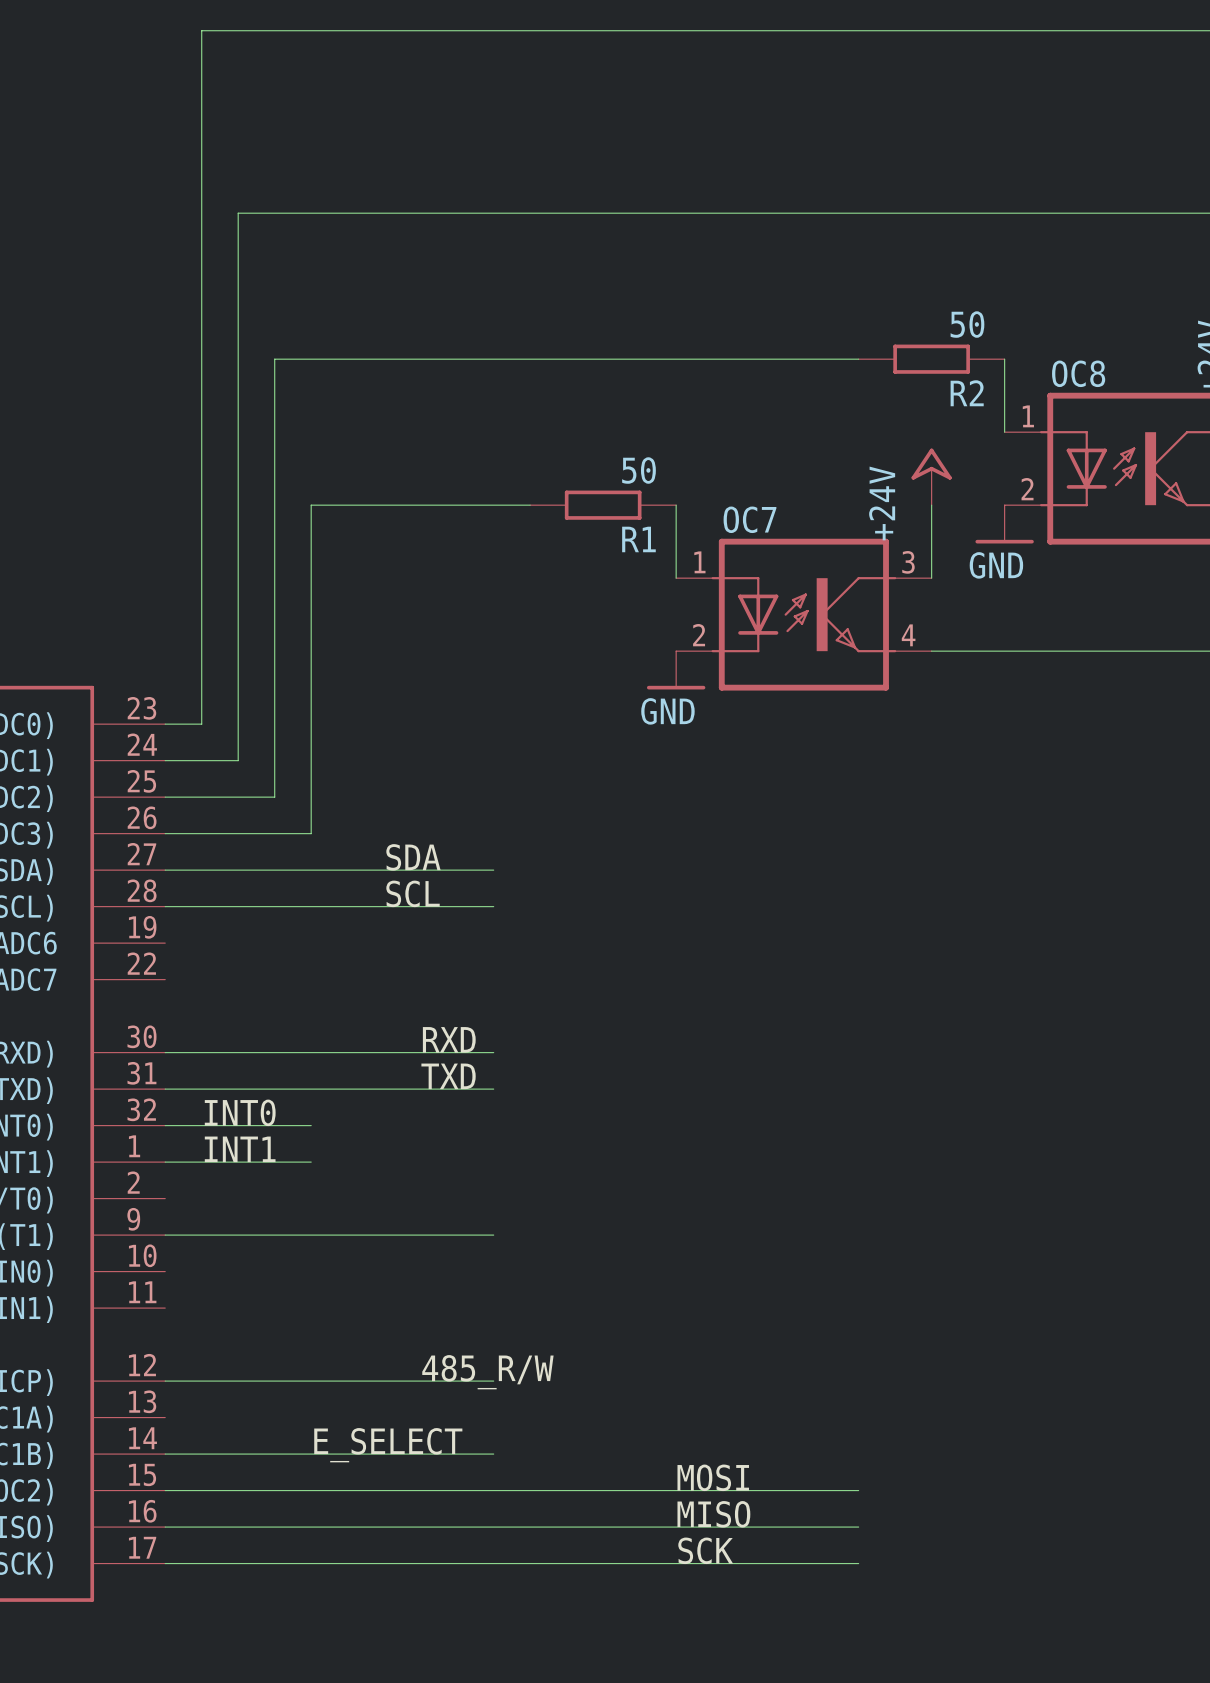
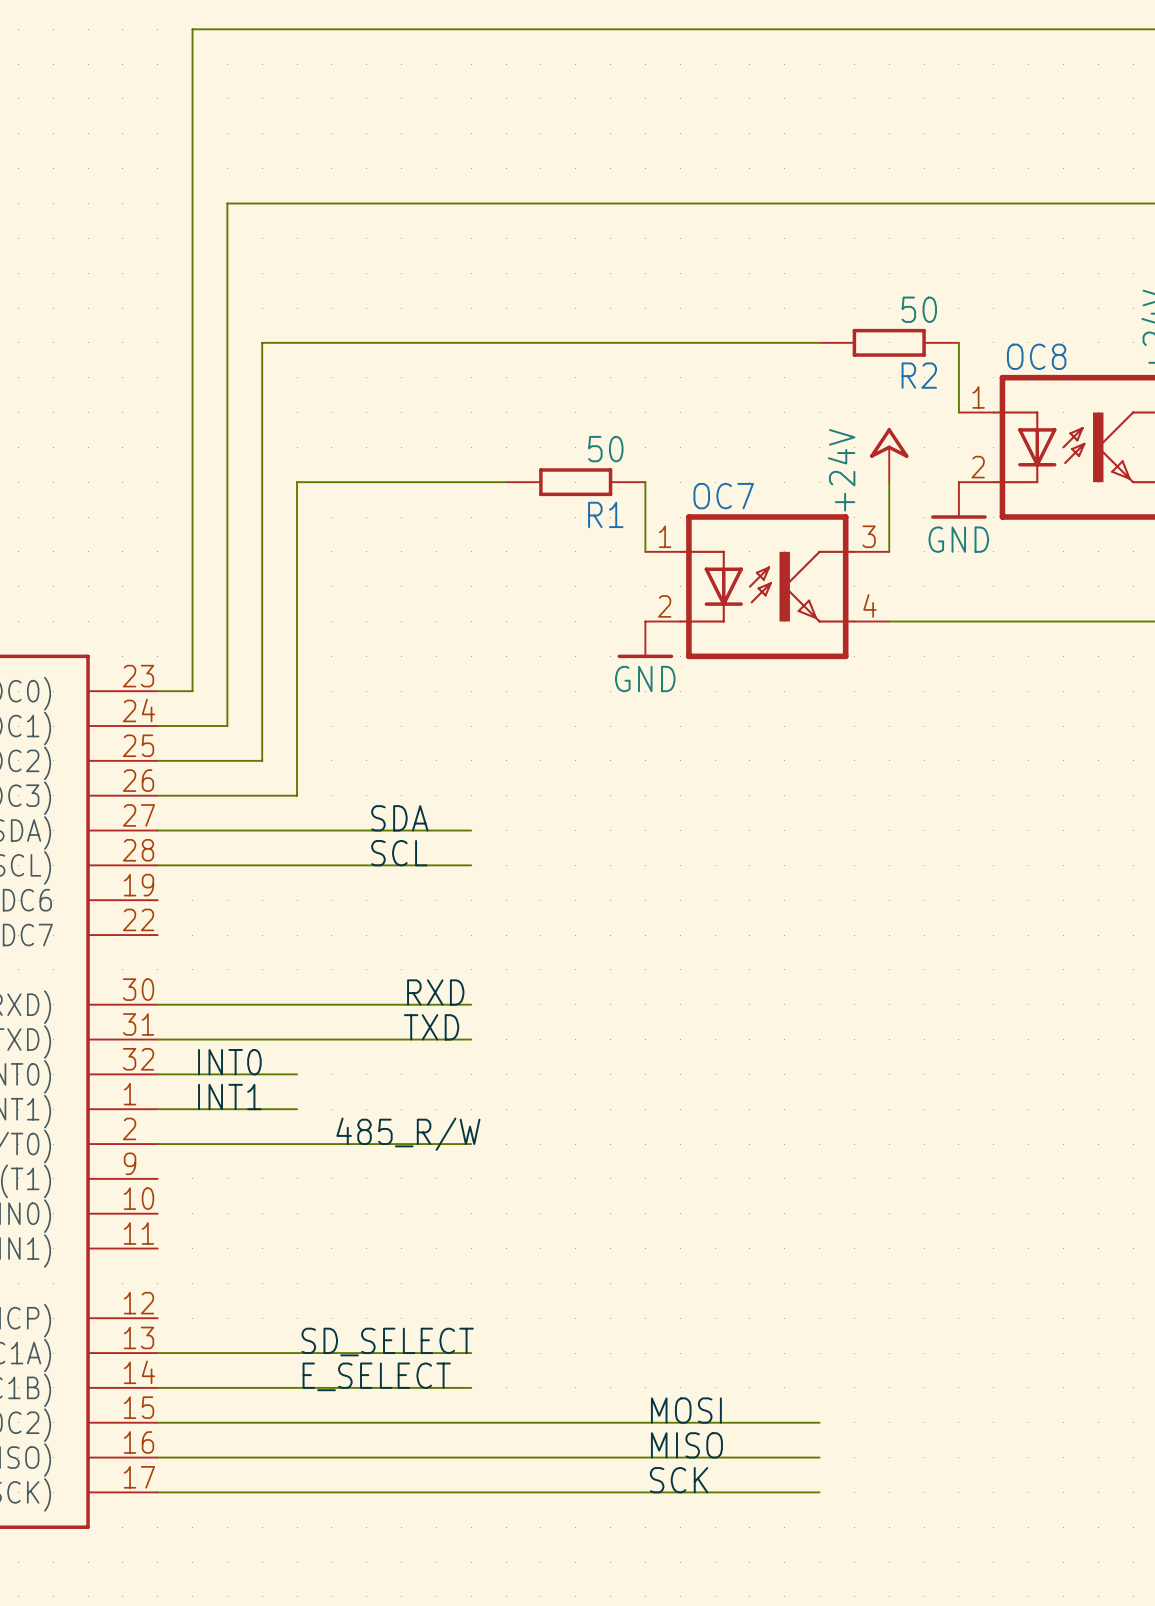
wire: (165, 1235) (493, 1235) -> (157, 1144) (471, 1144)
label position: 485_R/W (487, 1372) -> 485_R/W (408, 1134)
wire: (165, 1381) (493, 1381) -> (157, 1353) (471, 1353)
label: none -> SD_SELECT (387, 1342)

